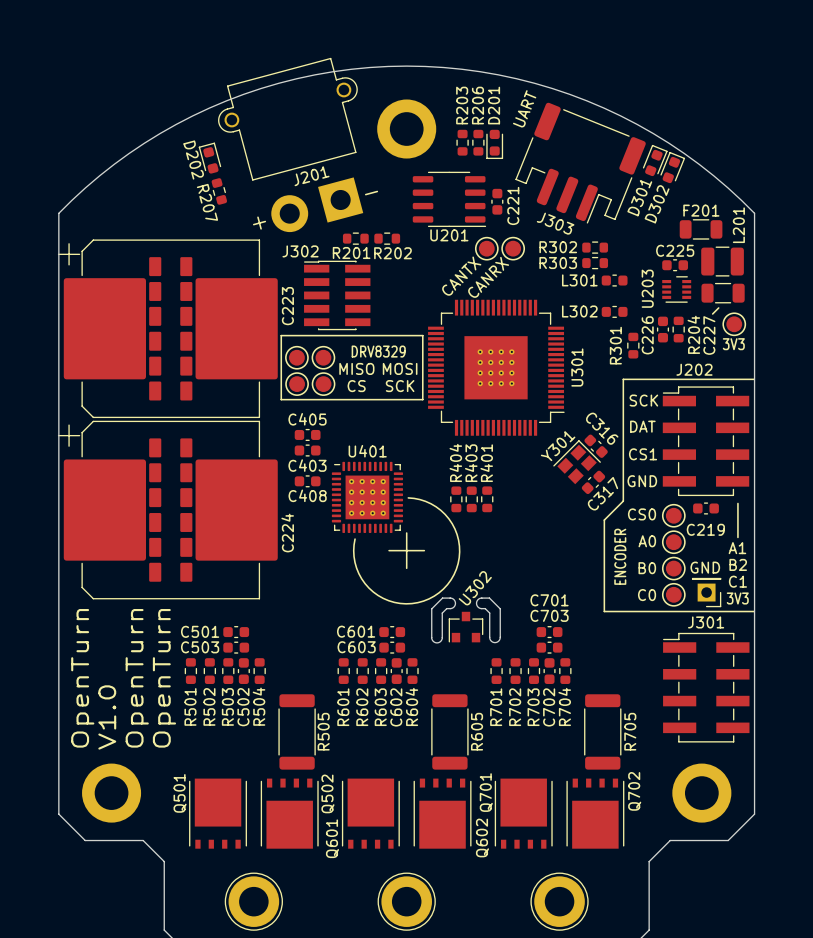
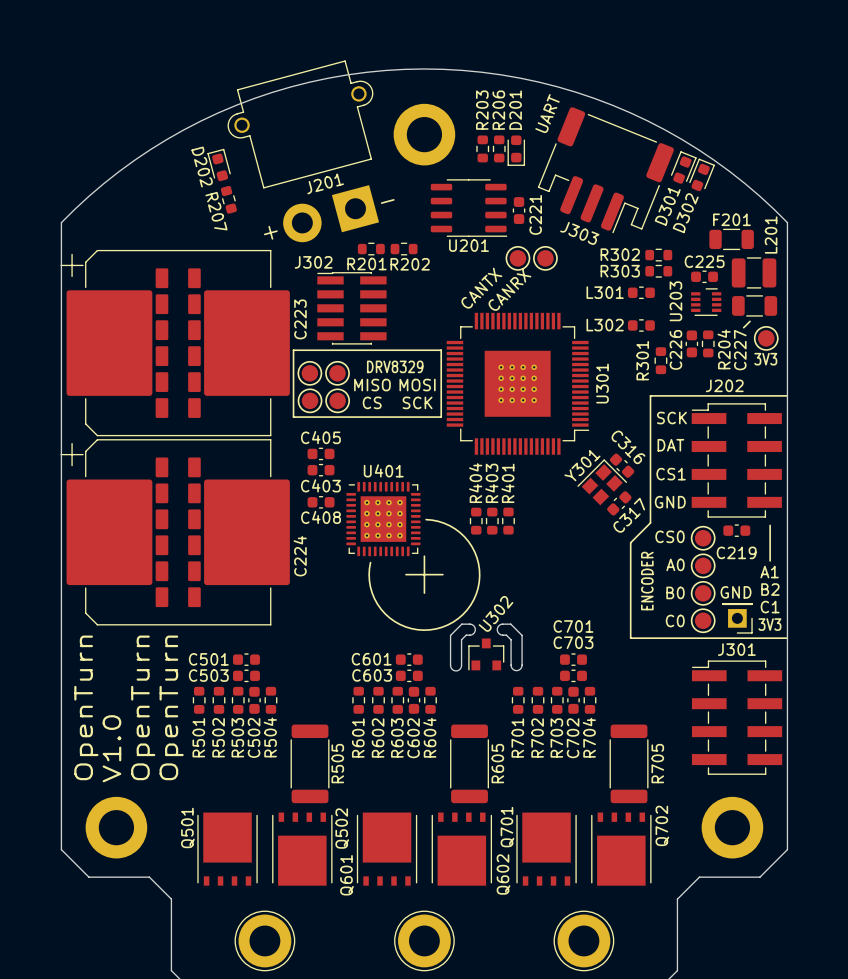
part: none -> (517, 258)
part: none -> (545, 258)
R302 position: (595, 247) -> (658, 255)
part: (486, 248) -> none
part: (513, 248) -> none
R303 position: (595, 263) -> (658, 271)

